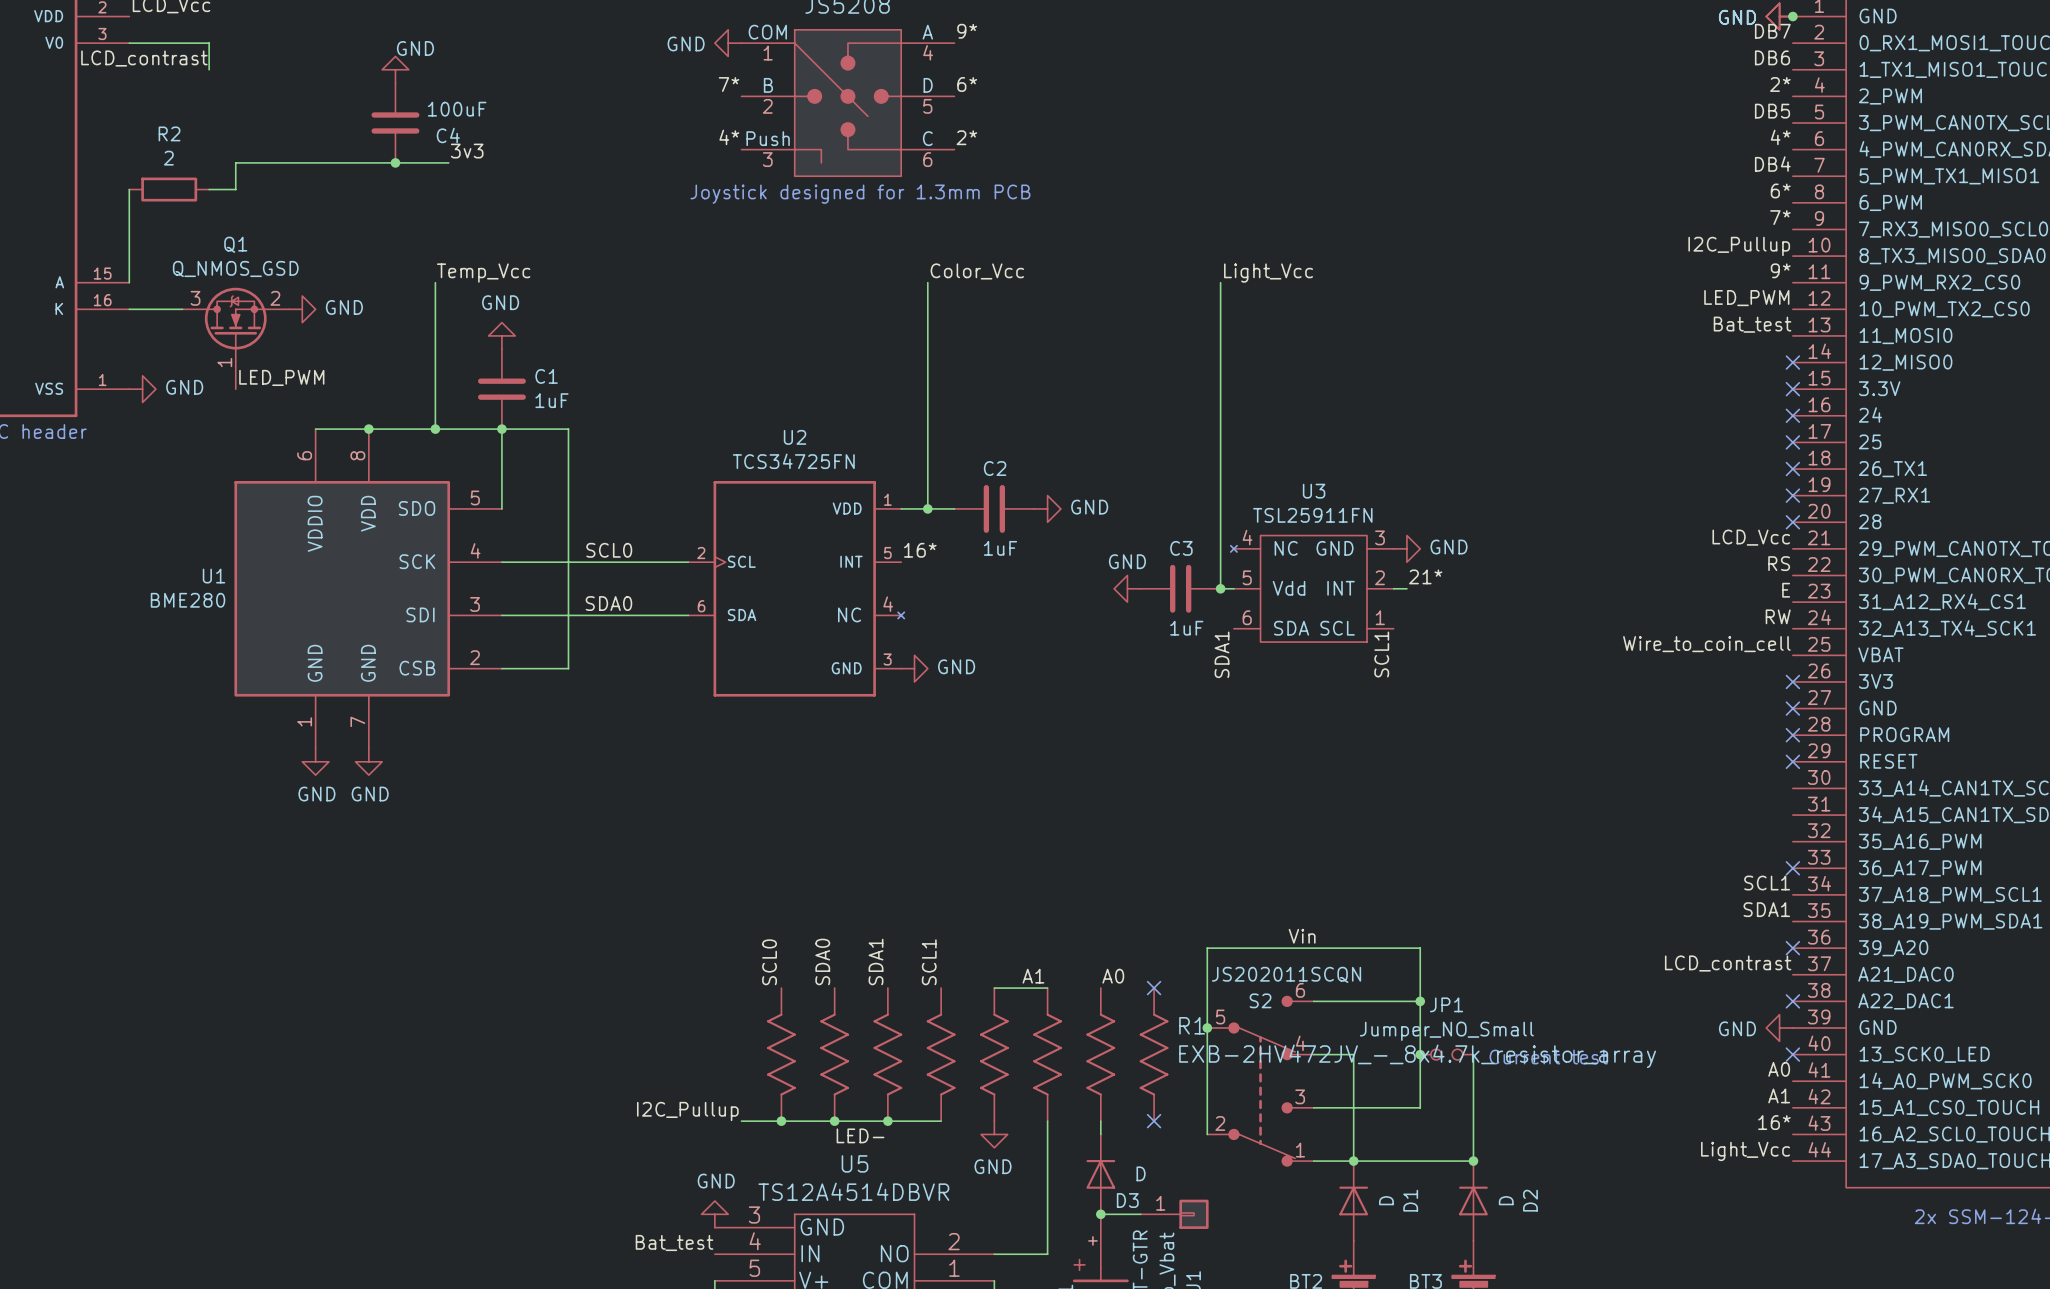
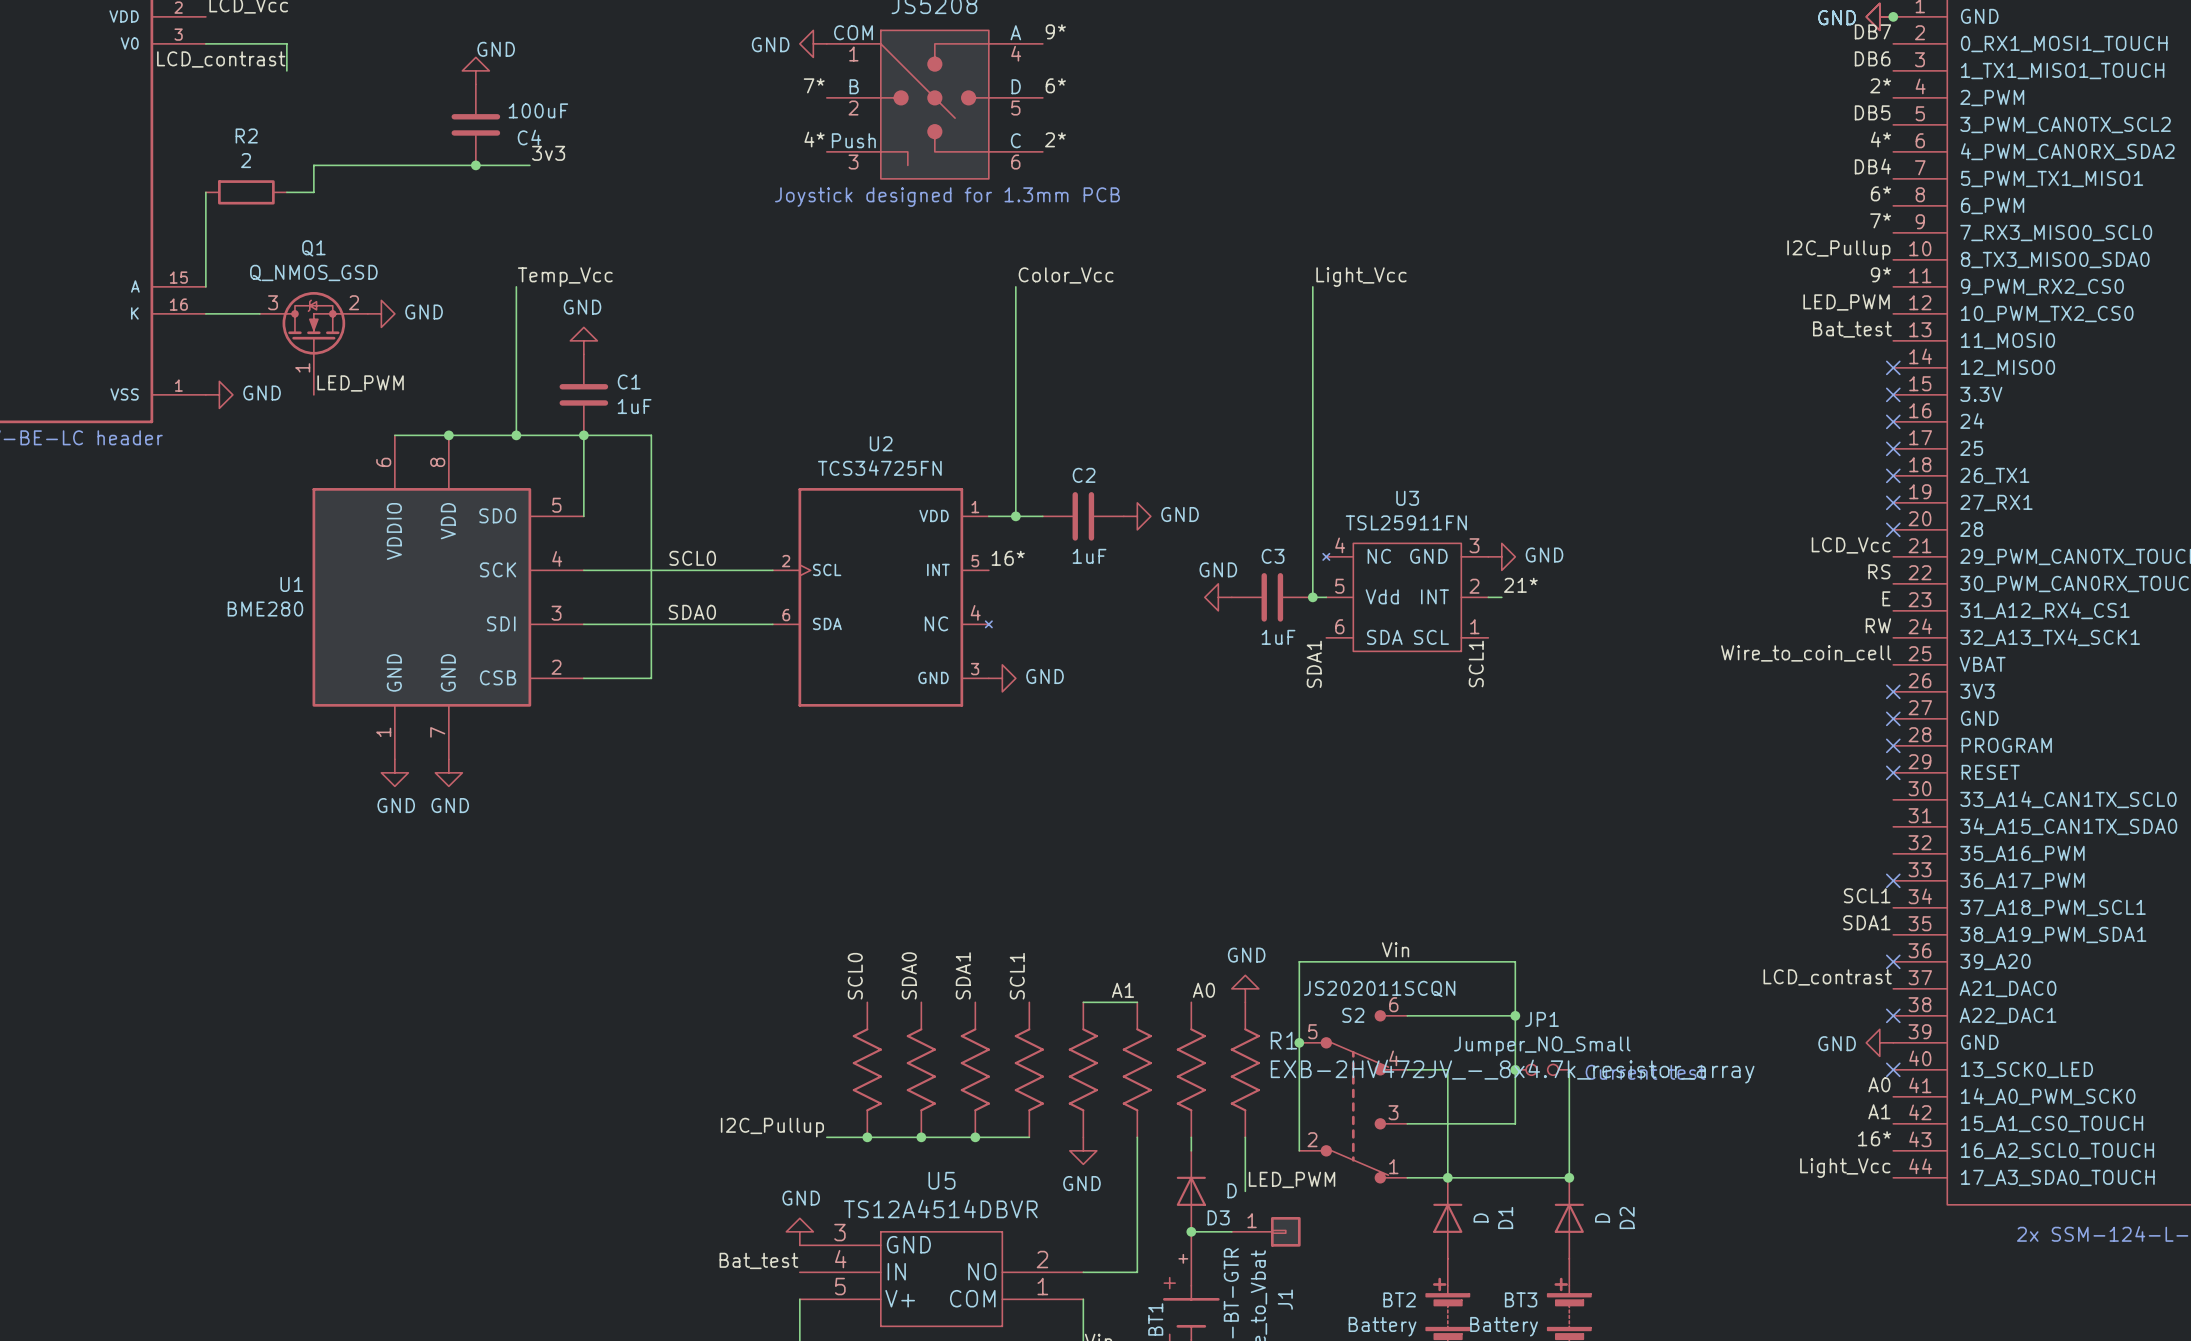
power symbol: none -> GND (1245, 988)
no-connect mark: (1154, 988) -> none
wire: none -> (1245, 1137) (1245, 1191)
no-connect mark: (1154, 1121) -> none
label: LED- (860, 1135) -> none
label: none -> LED_PWM (1292, 1179)

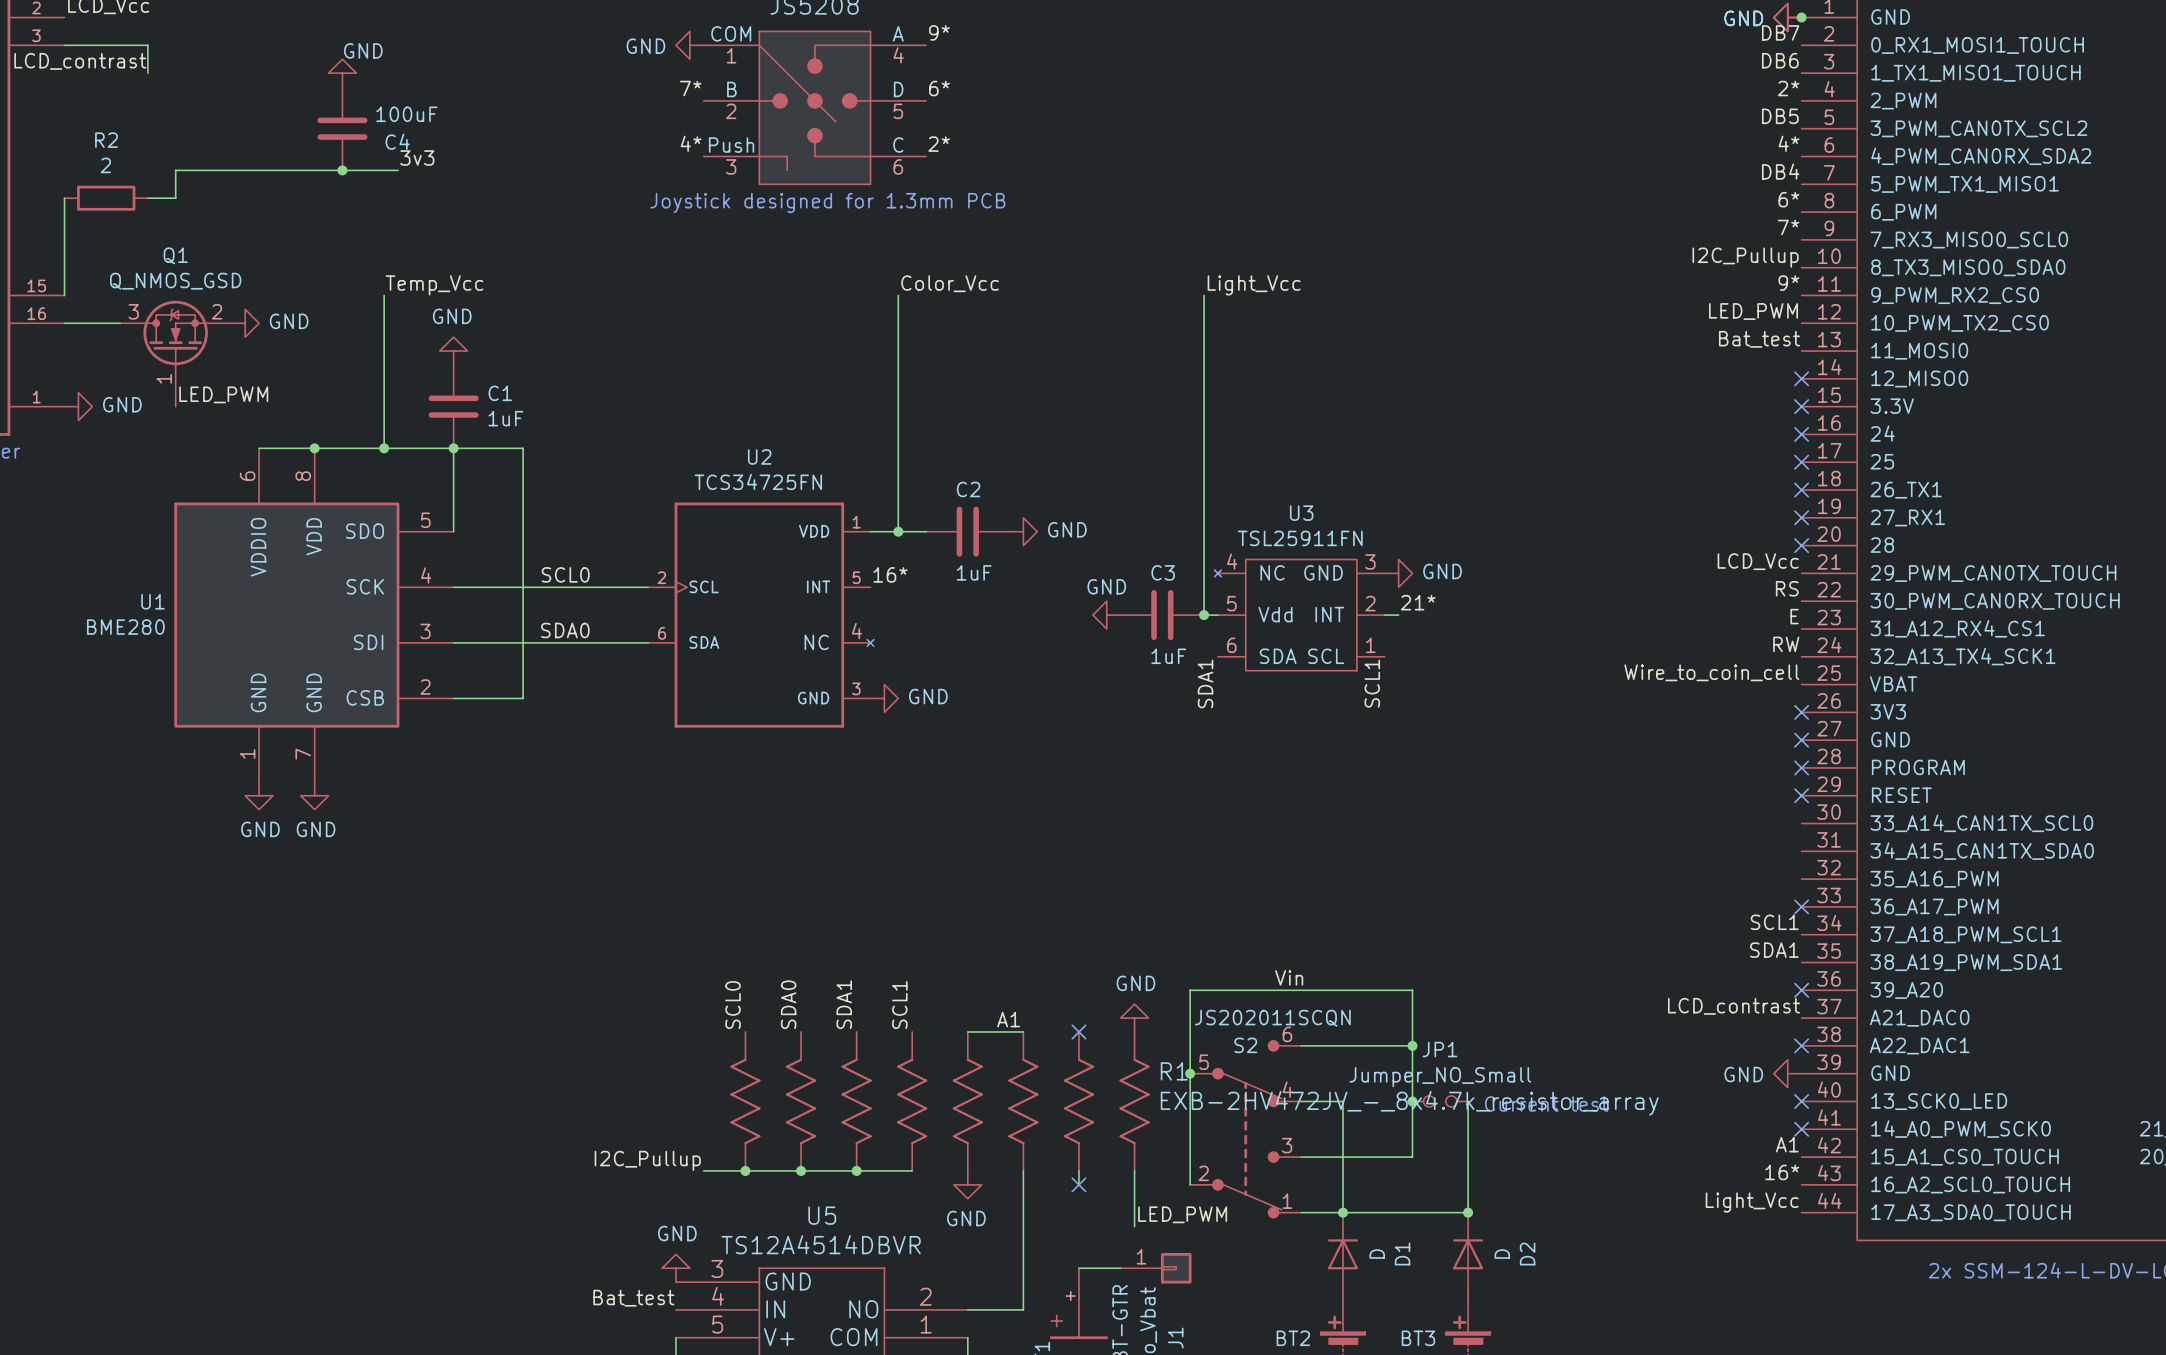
label: A0 (1203, 990) -> none
no-connect mark: none -> (1078, 1031)
label: A0 (1879, 1084) -> none
no-connect mark: none -> (1801, 1129)
no-connect mark: none -> (1078, 1184)
D3: D (1191, 1191) -> none
junction: (1191, 1231) -> none

